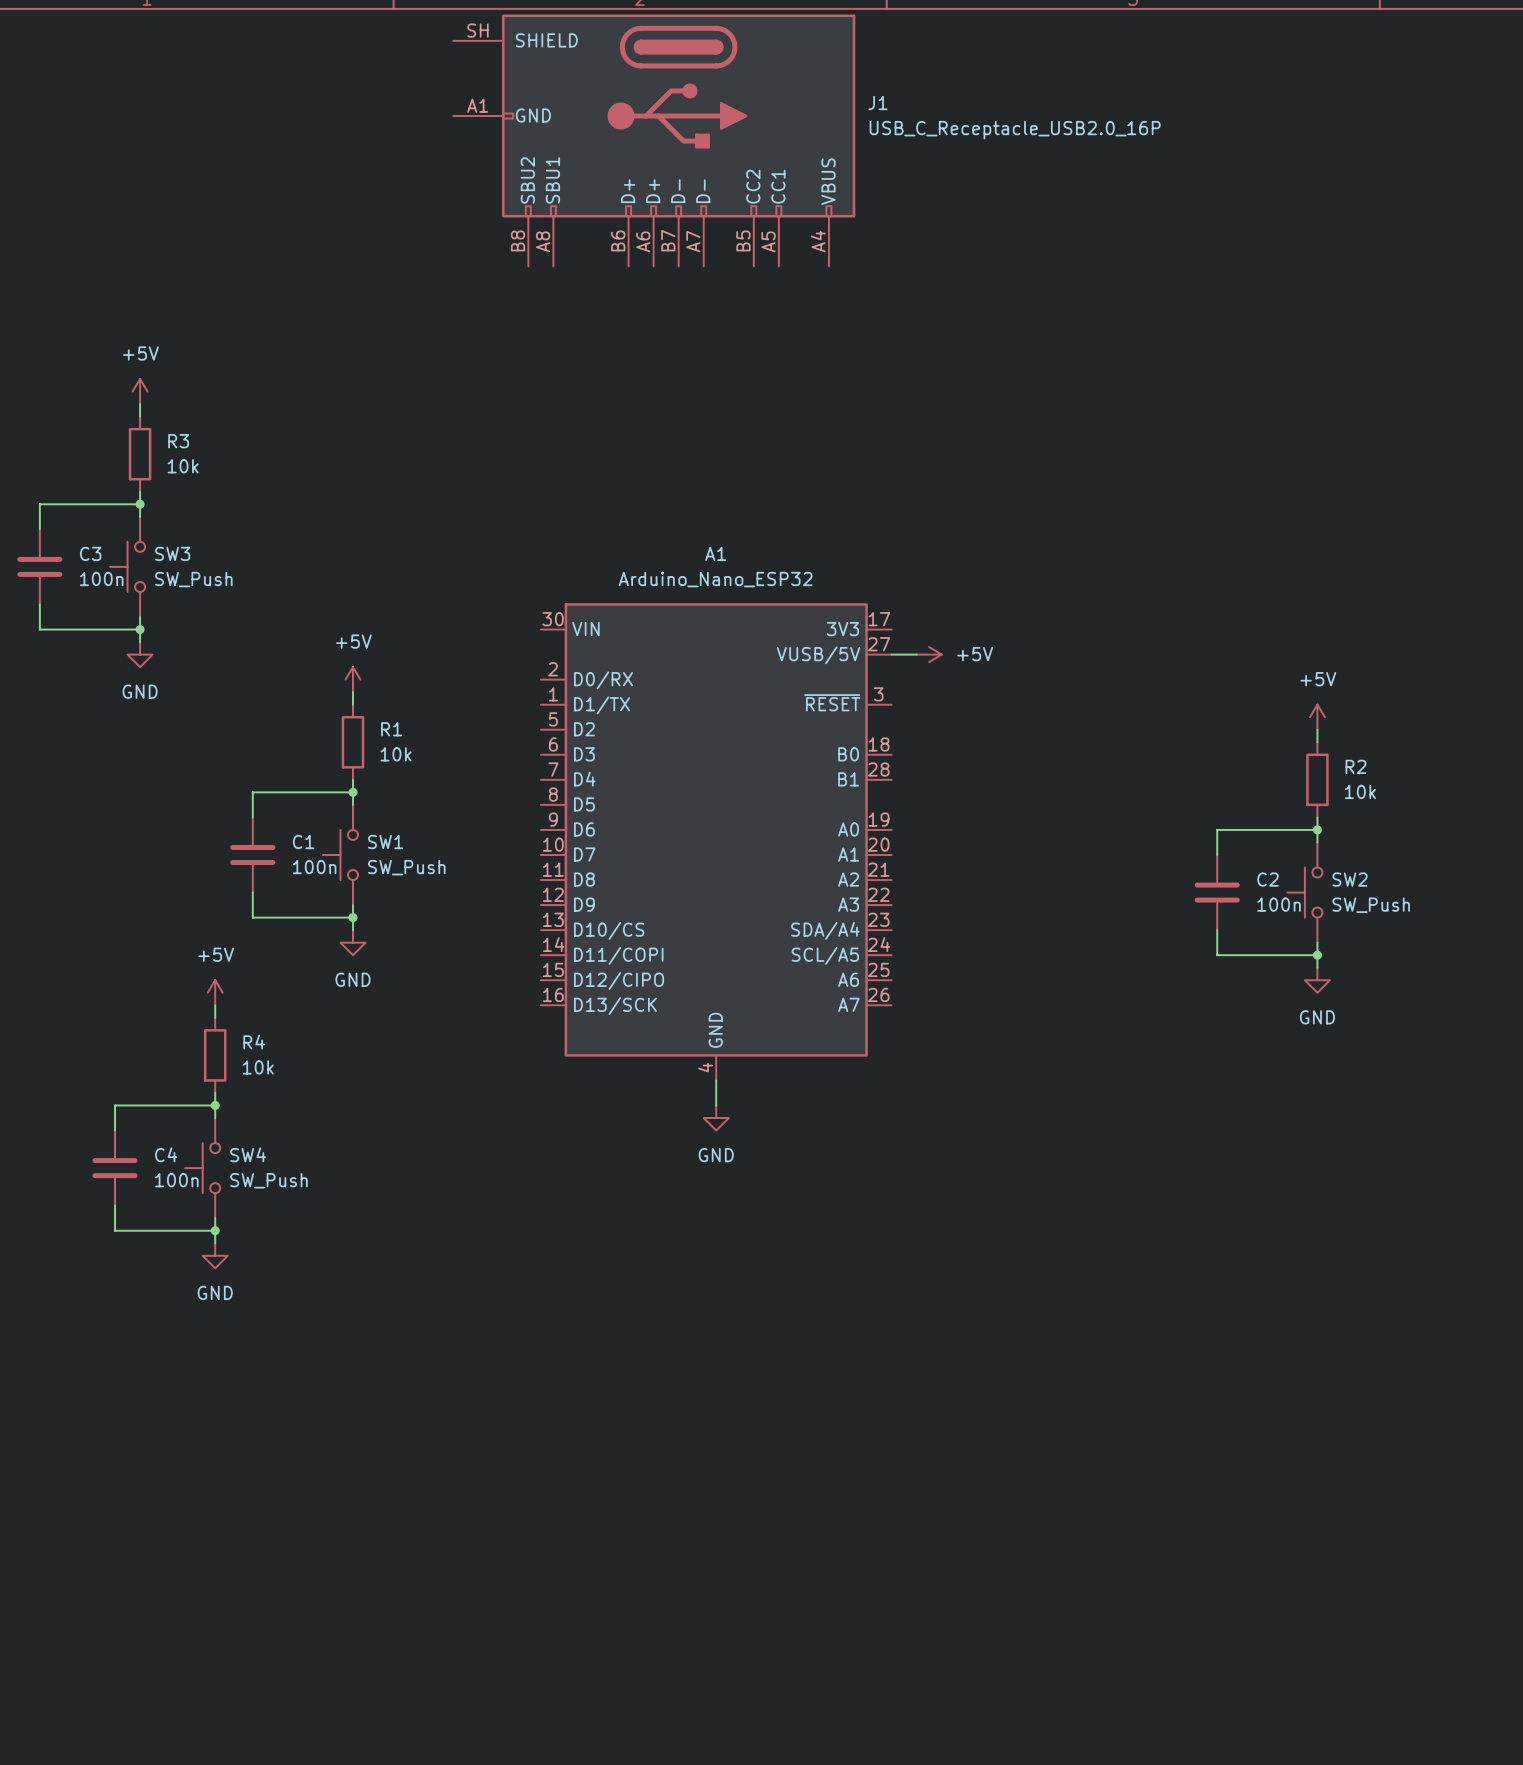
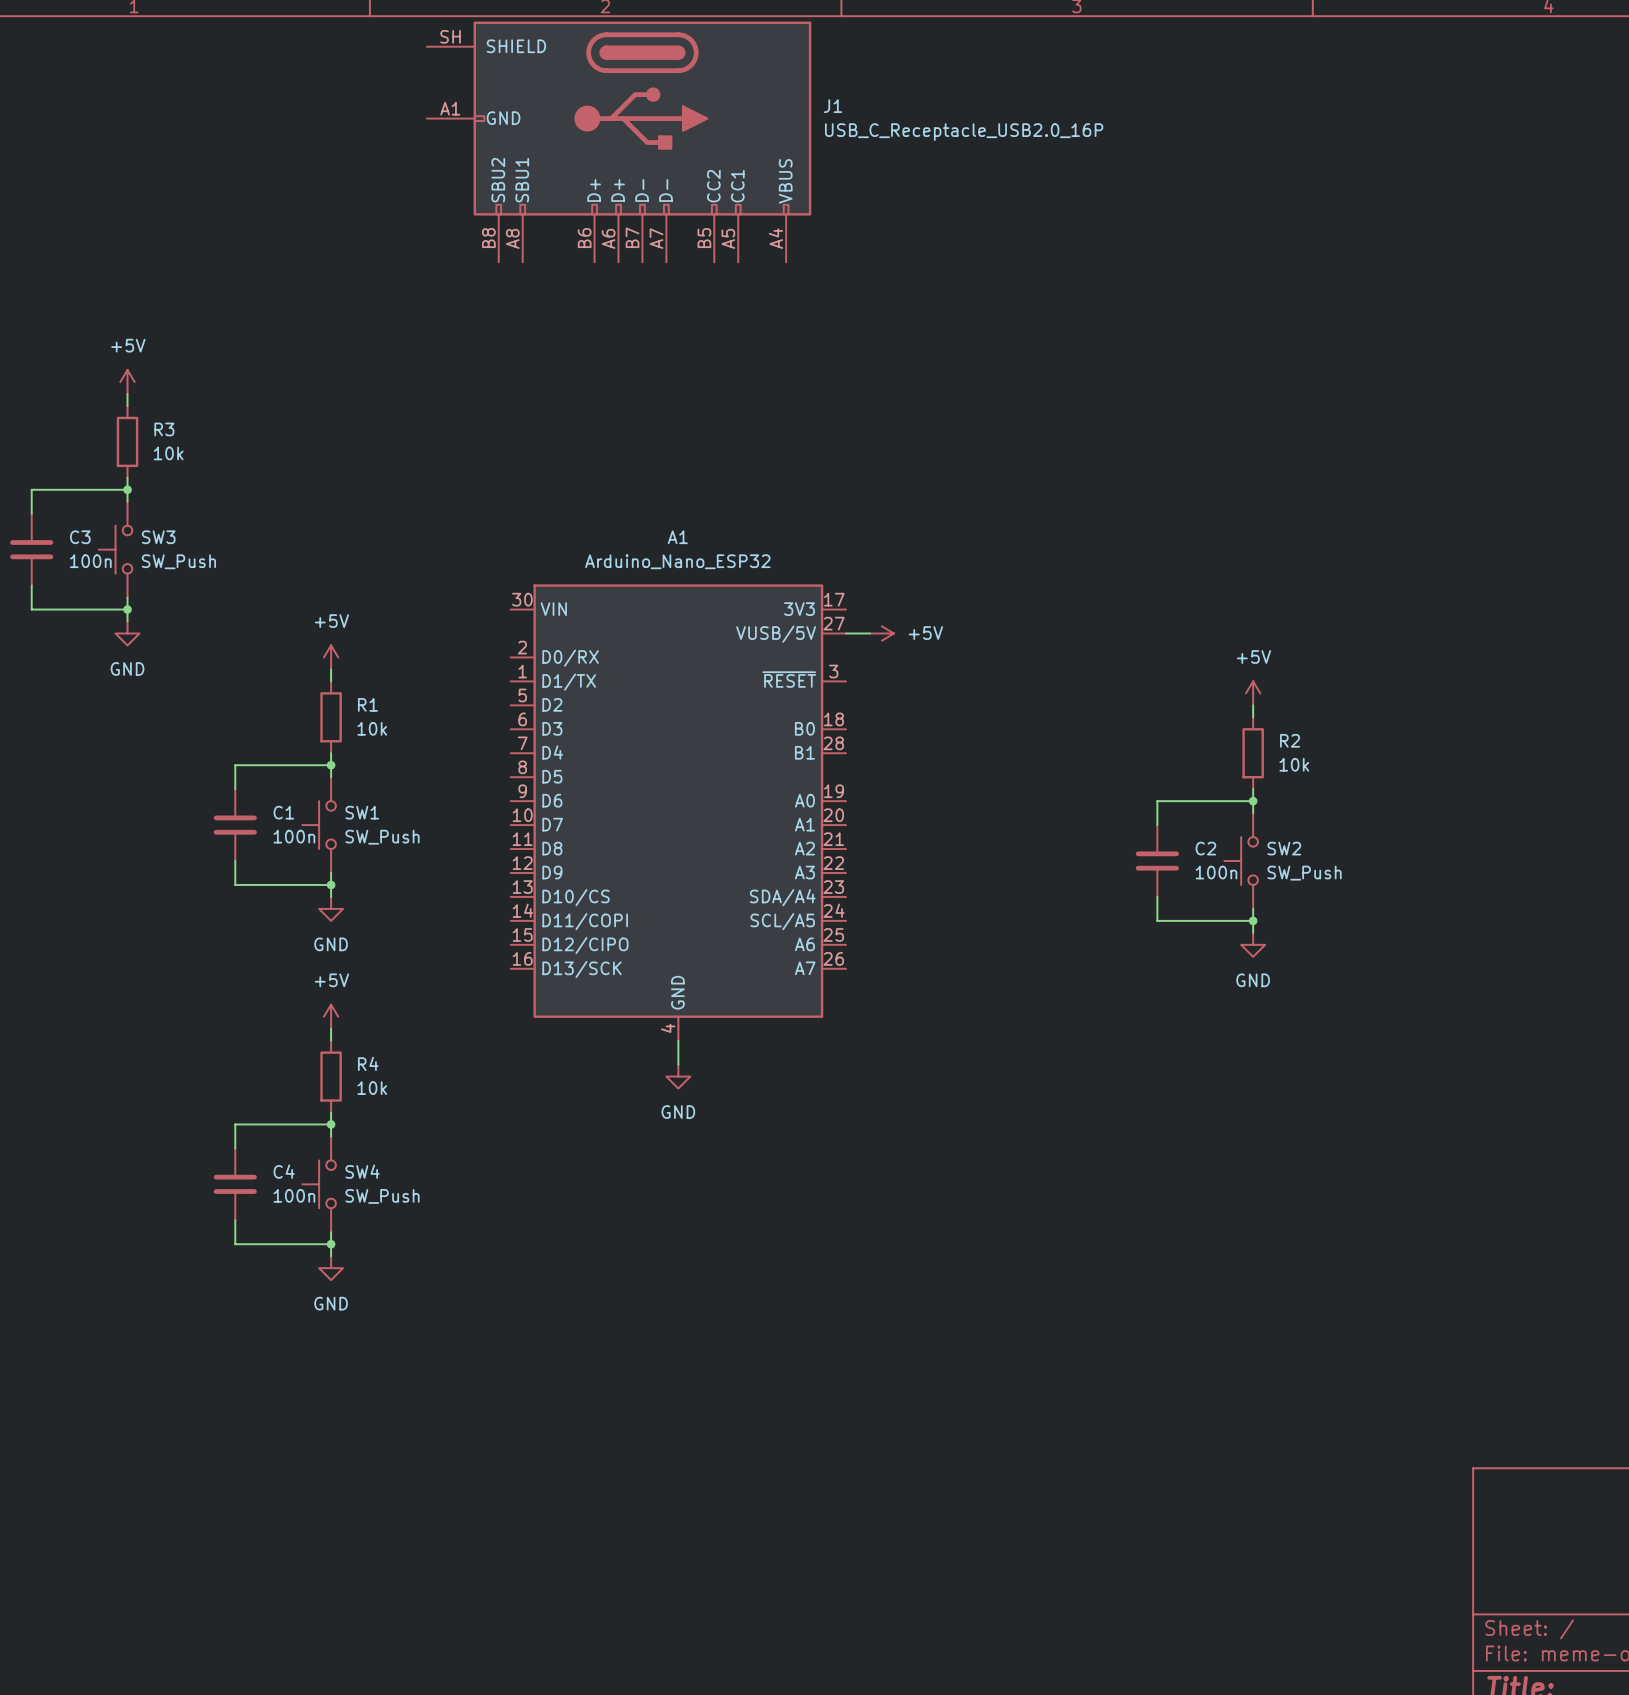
power symbol position: +5V (215, 992) -> +5V (331, 1016)
wire: (215, 1005) (215, 1017) -> (331, 1028) (331, 1040)
R4 position: (215, 1055) -> (331, 1076)
wire: (215, 1092) (215, 1118) -> (331, 1112) (331, 1136)
wire: (215, 1105) (115, 1105) (115, 1130) -> (331, 1124) (235, 1124) (235, 1148)
junction: (215, 1105) -> none
C4 position: (115, 1168) -> (235, 1184)
SW4 position: (202, 1168) -> (319, 1184)
junction: none -> (331, 1124)
wire: (115, 1205) (115, 1230) (215, 1230) -> (235, 1220) (235, 1244) (331, 1244)
wire: (215, 1218) (215, 1243) -> (331, 1232) (331, 1256)
junction: (215, 1230) -> none
power symbol position: GND (215, 1255) -> GND (331, 1268)
junction: none -> (331, 1244)

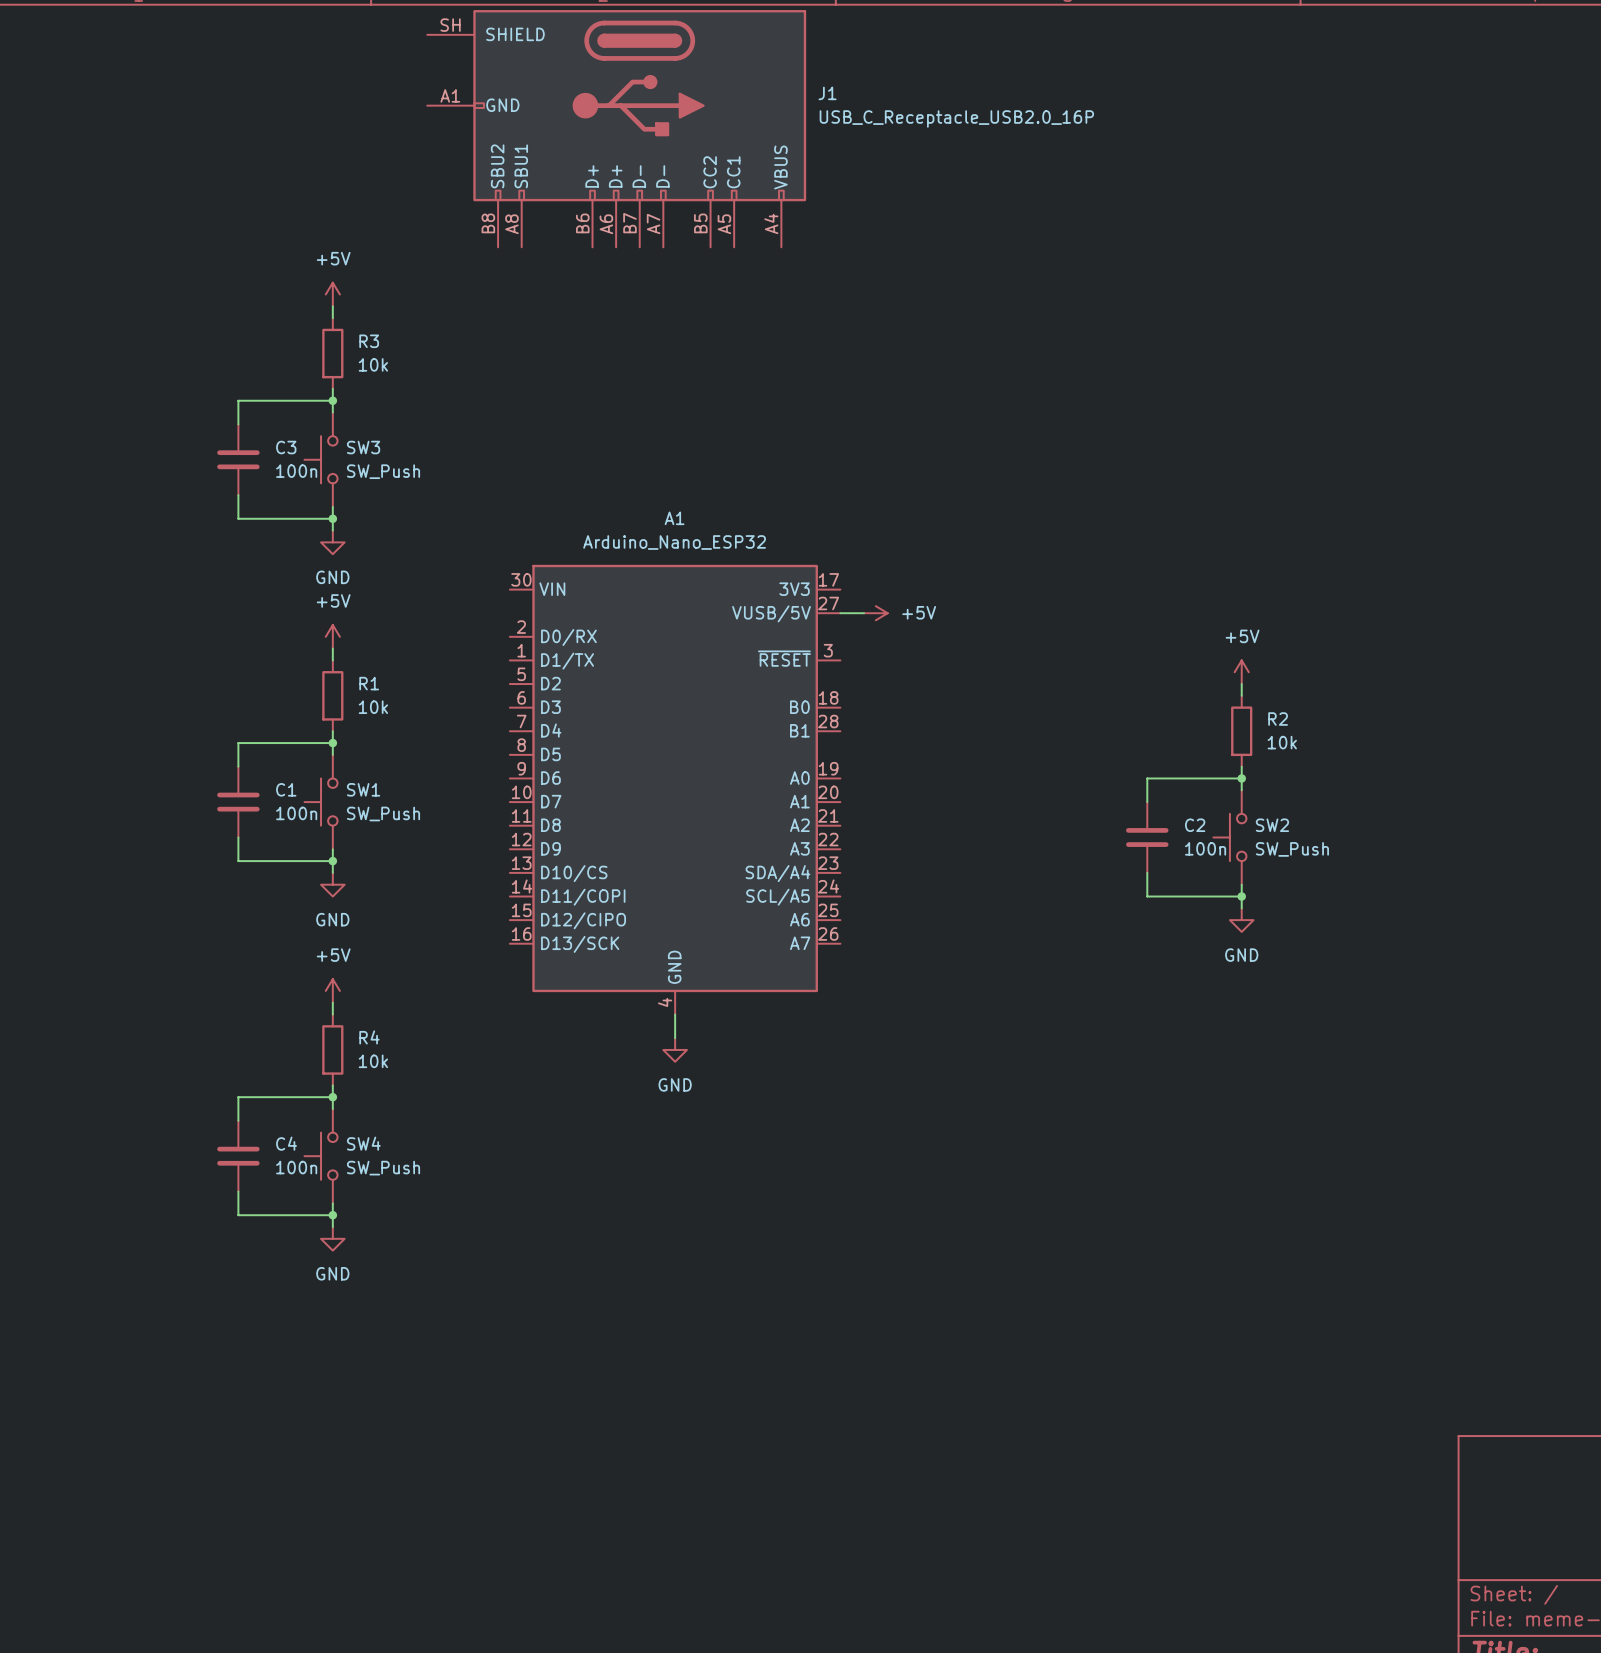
power symbol position: +5V (127, 382) -> +5V (332, 294)
wire: (127, 393) (127, 405) -> (332, 306) (332, 318)
junction: none -> (332, 400)
R3 position: (127, 441) -> (332, 353)
wire: (127, 477) (127, 501) -> (332, 388) (332, 412)
wire: (127, 489) (31, 489) (31, 513) -> (332, 400) (238, 400) (238, 424)
junction: (127, 489) -> none
junction: none -> (332, 518)
C3 position: (31, 549) -> (238, 459)
SW3 position: (115, 549) -> (321, 459)
wire: (31, 585) (31, 609) (127, 609) -> (238, 495) (238, 518) (332, 518)
wire: (127, 597) (127, 621) -> (332, 506) (332, 530)
junction: (127, 609) -> none
power symbol position: GND (127, 633) -> GND (332, 542)

